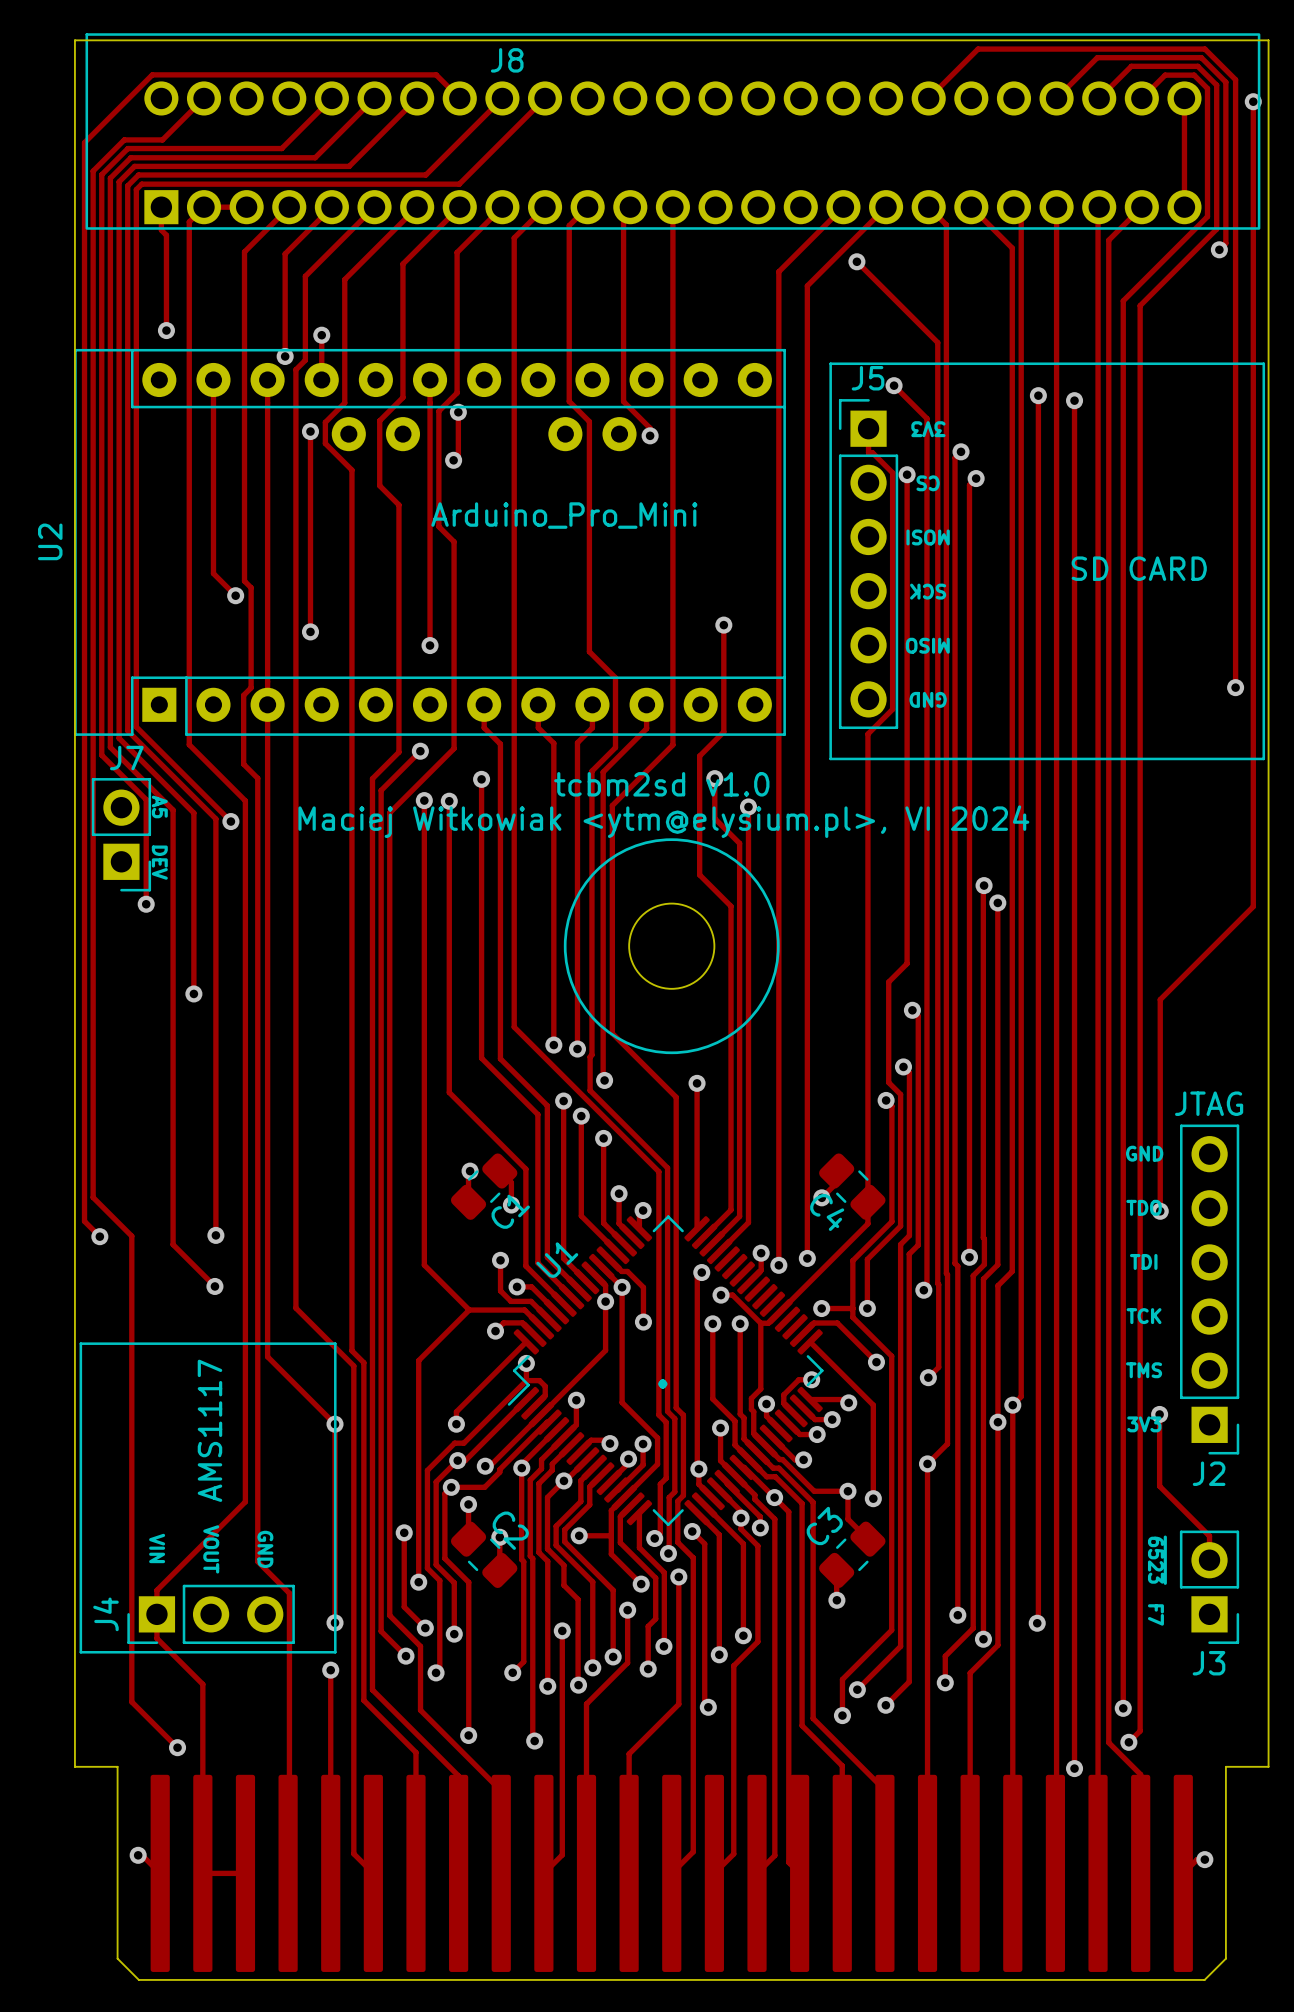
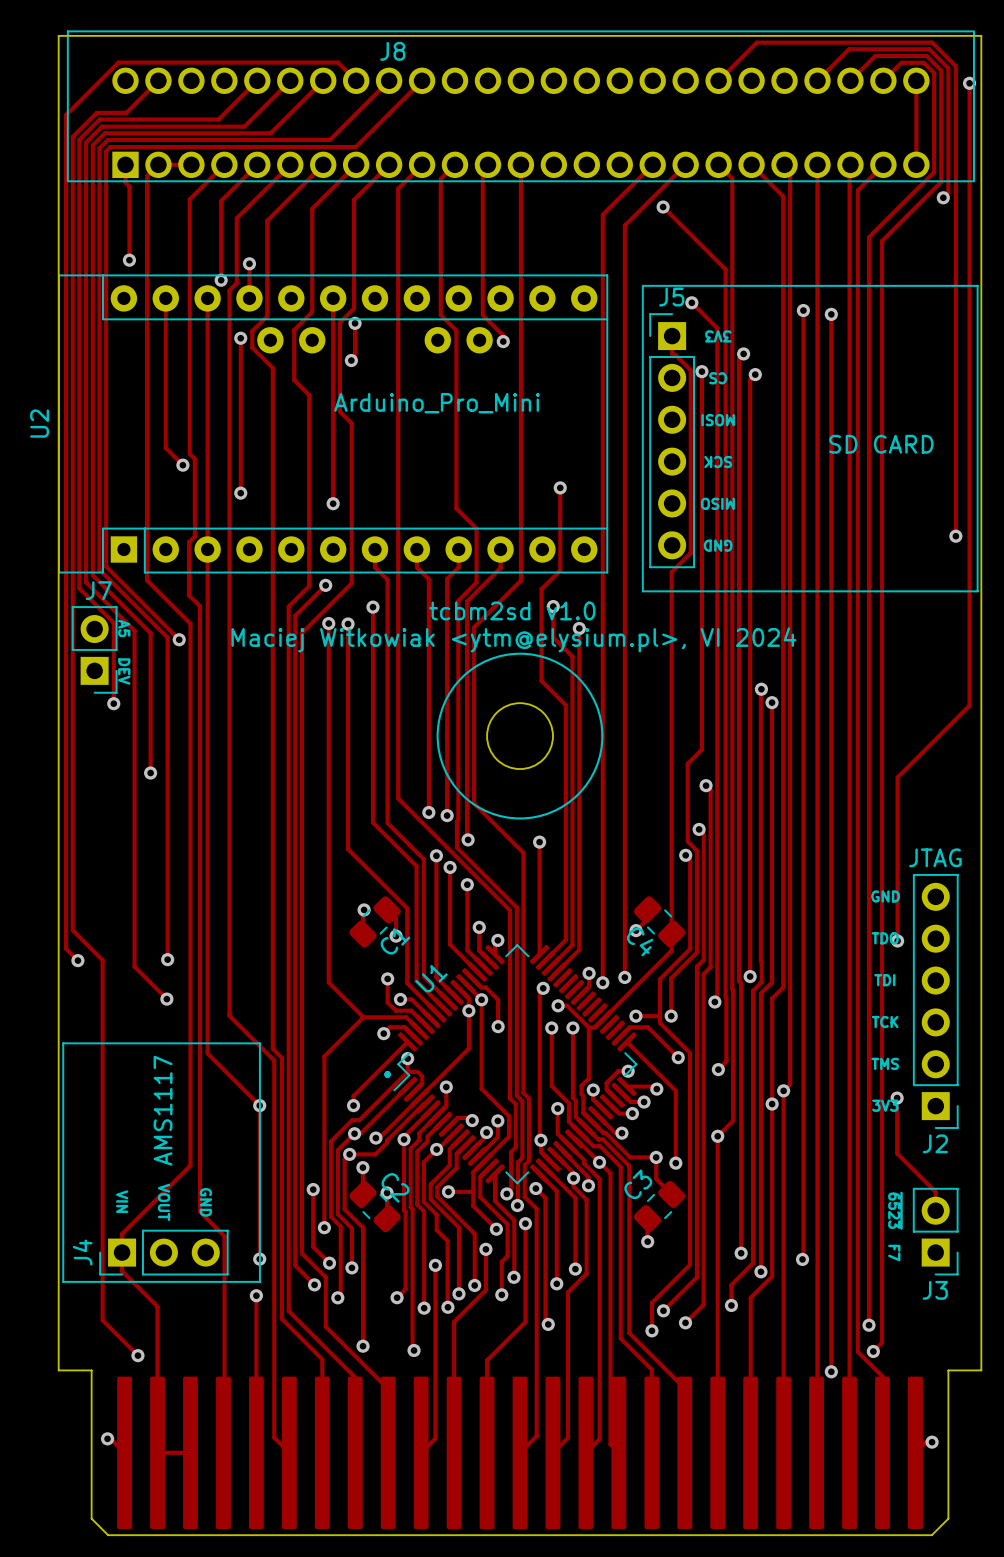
text position: . (662, 1383) -> . (387, 1074)

